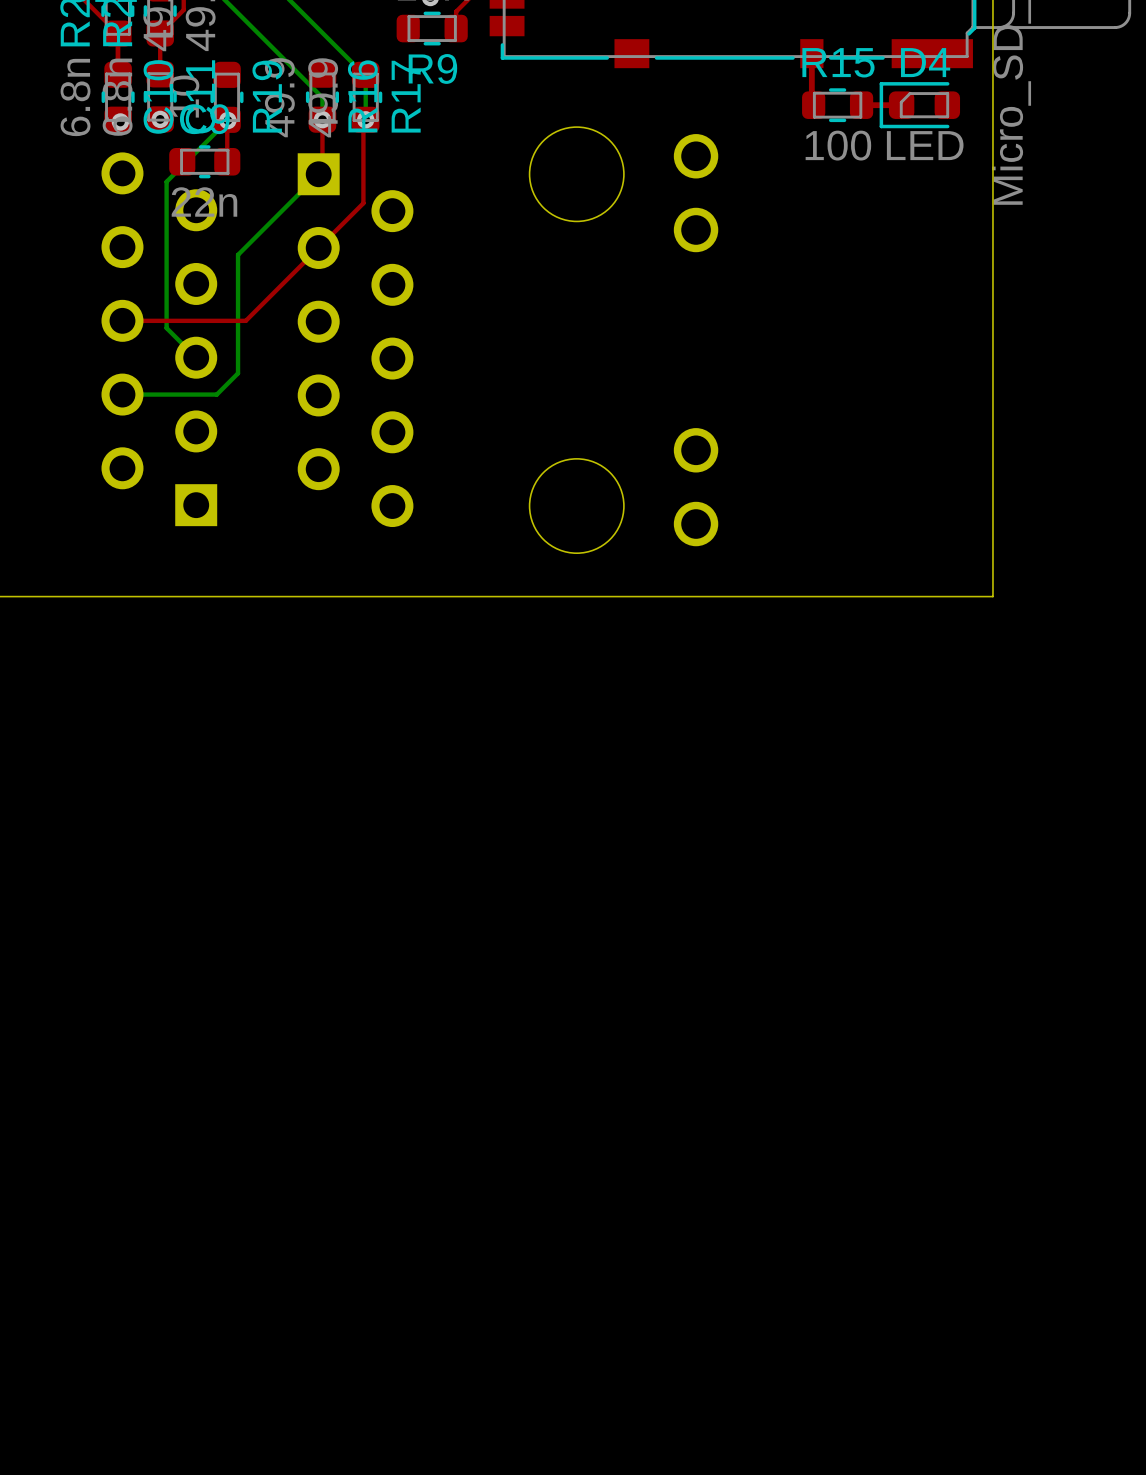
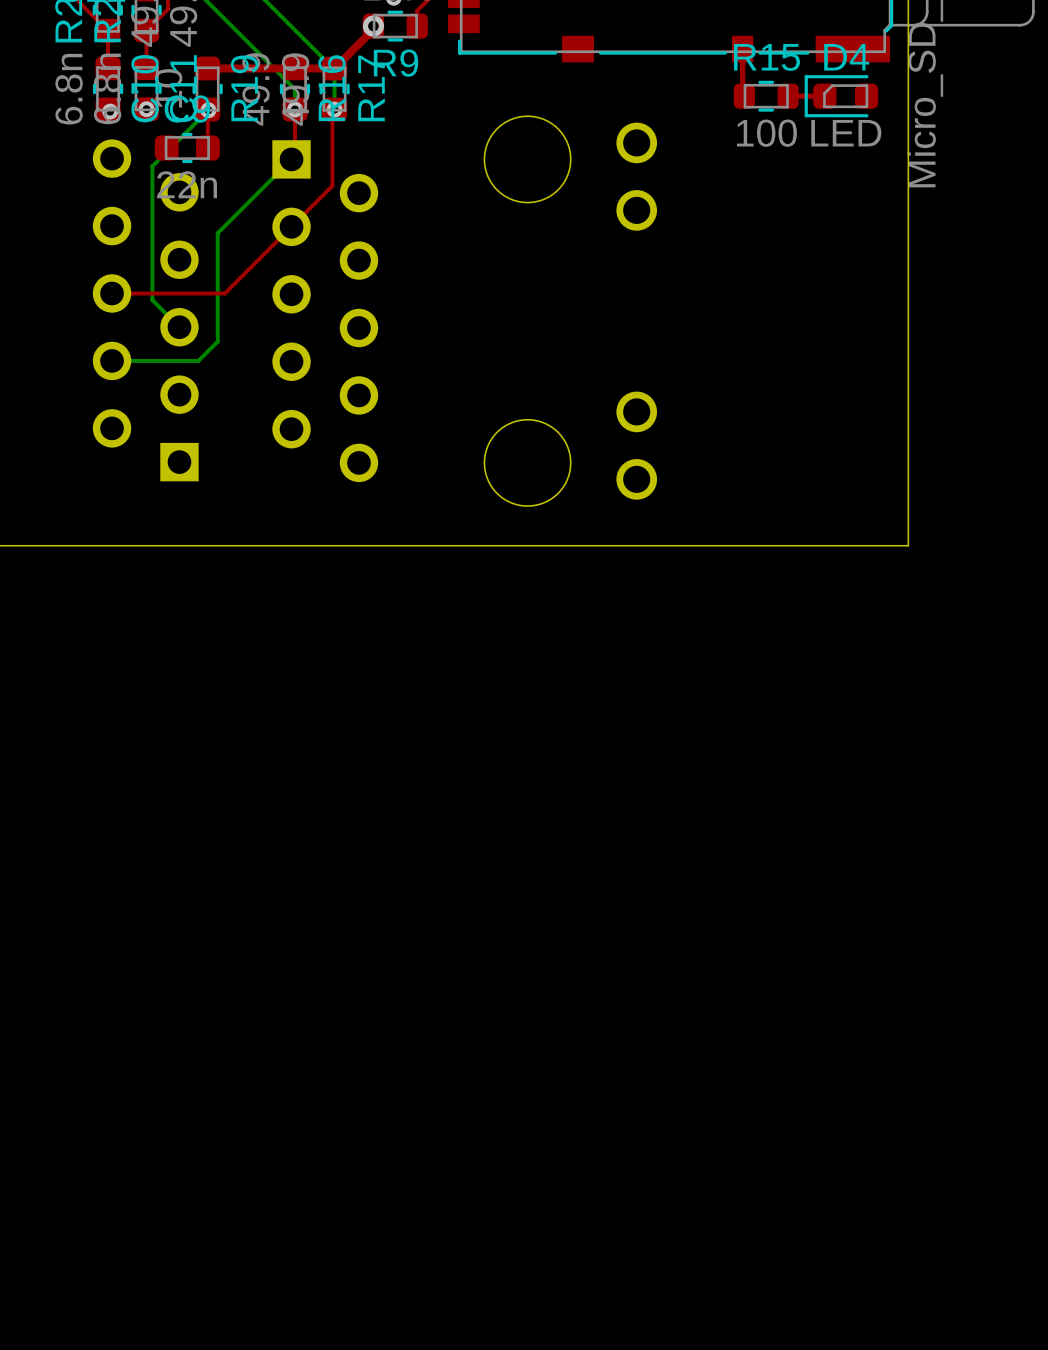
top track: none -> (373, 26) (373, 29) (334, 68) (295, 68)
via: none -> (373, 26)
top track: none -> (207, 68) (294, 68)

